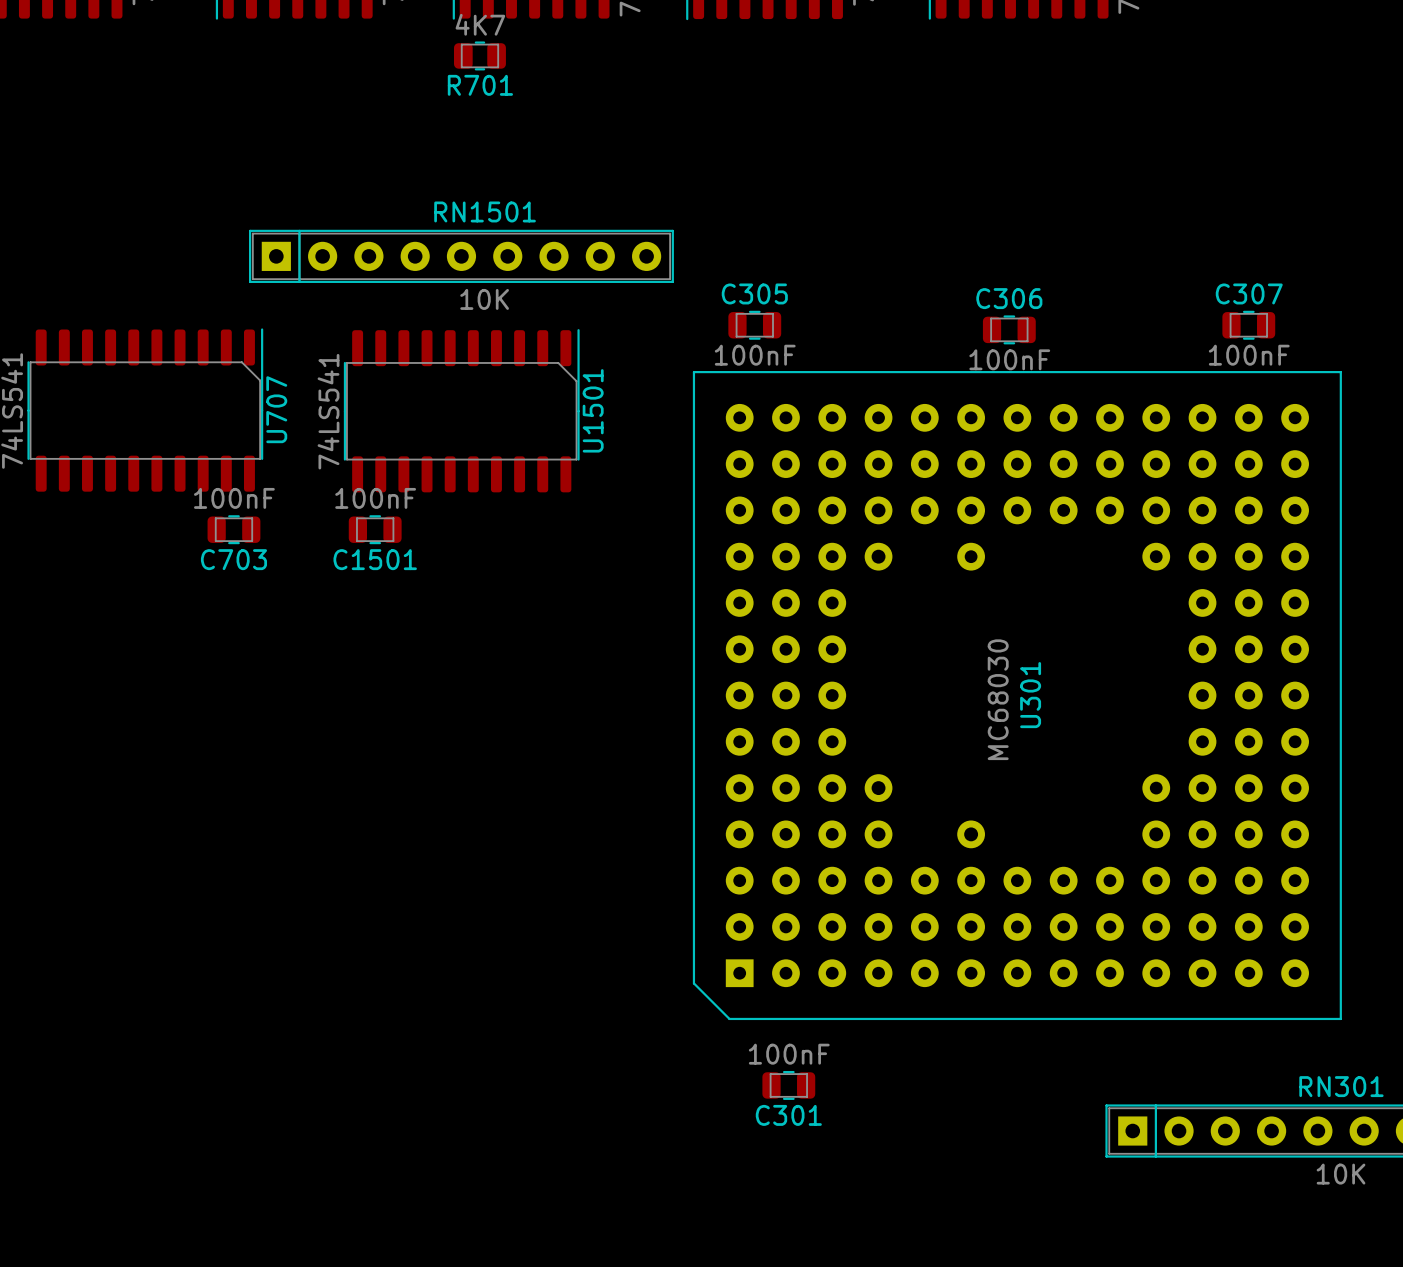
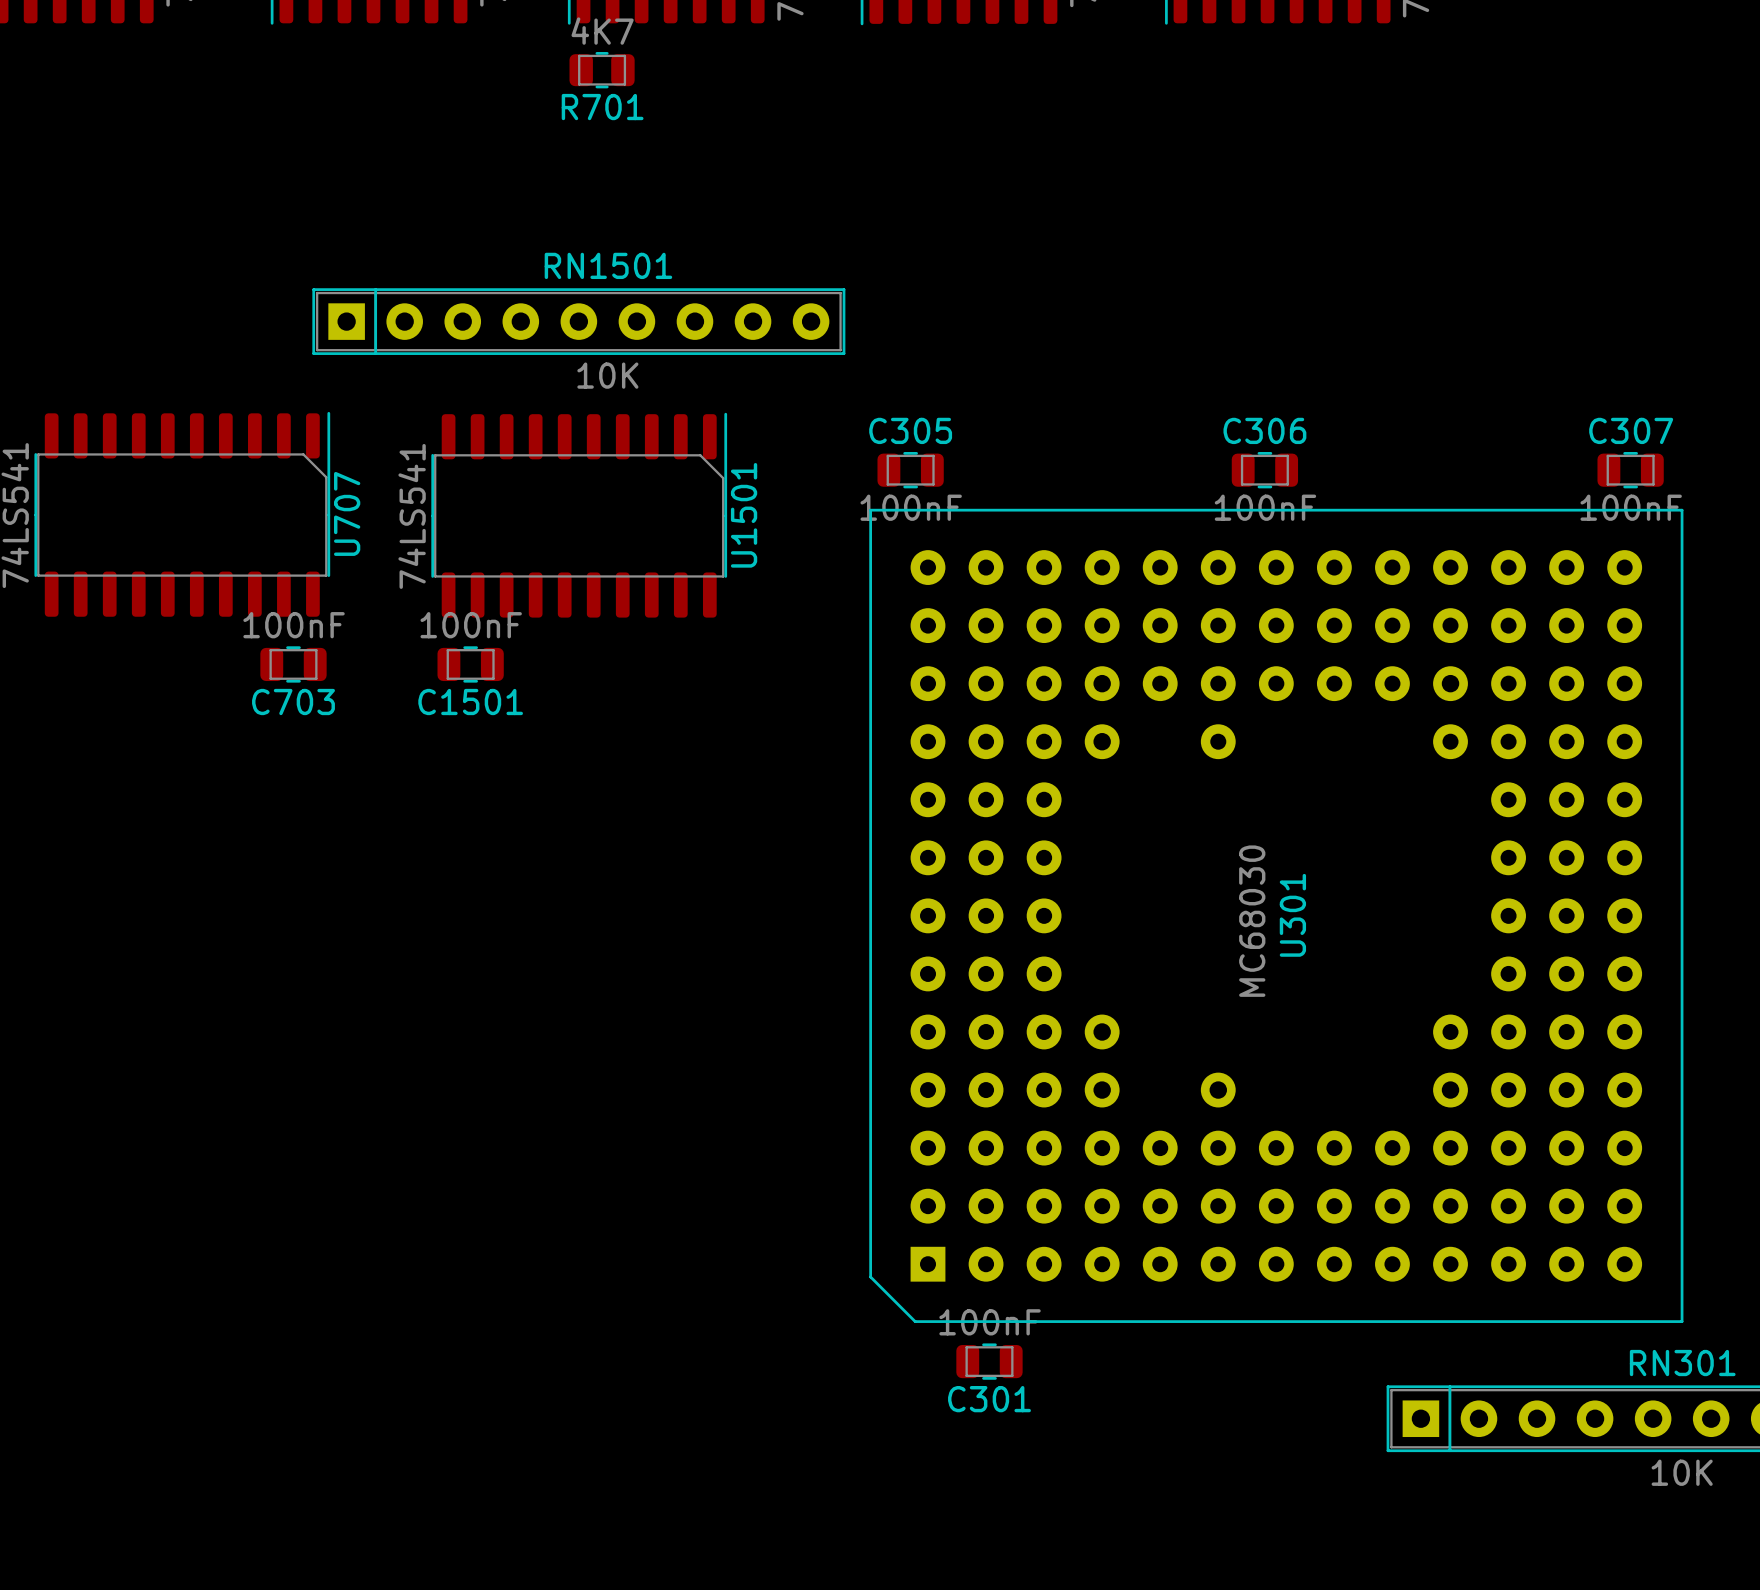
C305 position: (754, 325) -> (910, 470)
C307 position: (1248, 325) -> (1630, 470)
C306 position: (1009, 329) -> (1264, 470)
U301 position: (1017, 695) -> (1276, 915)

